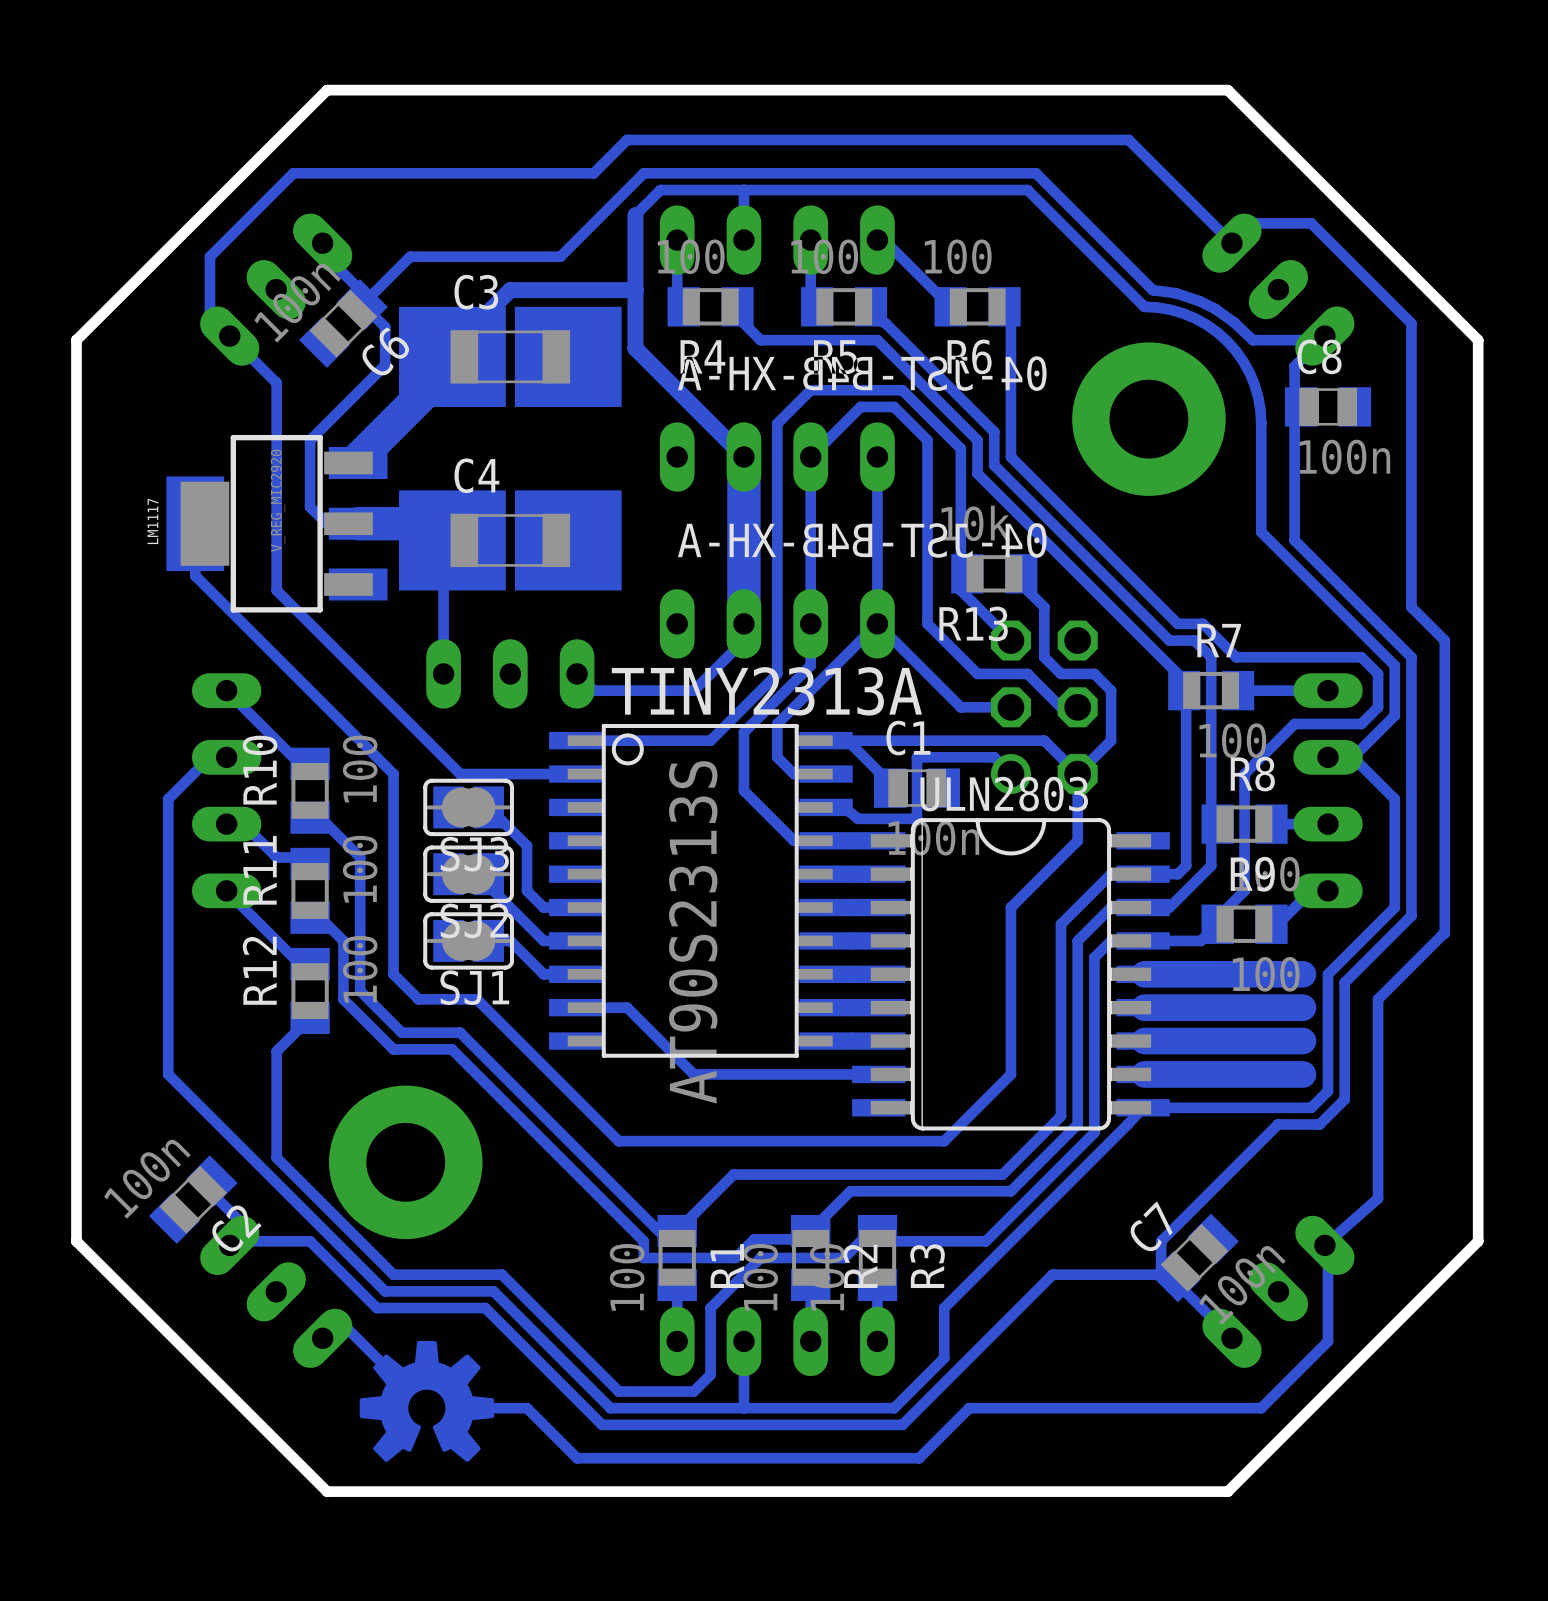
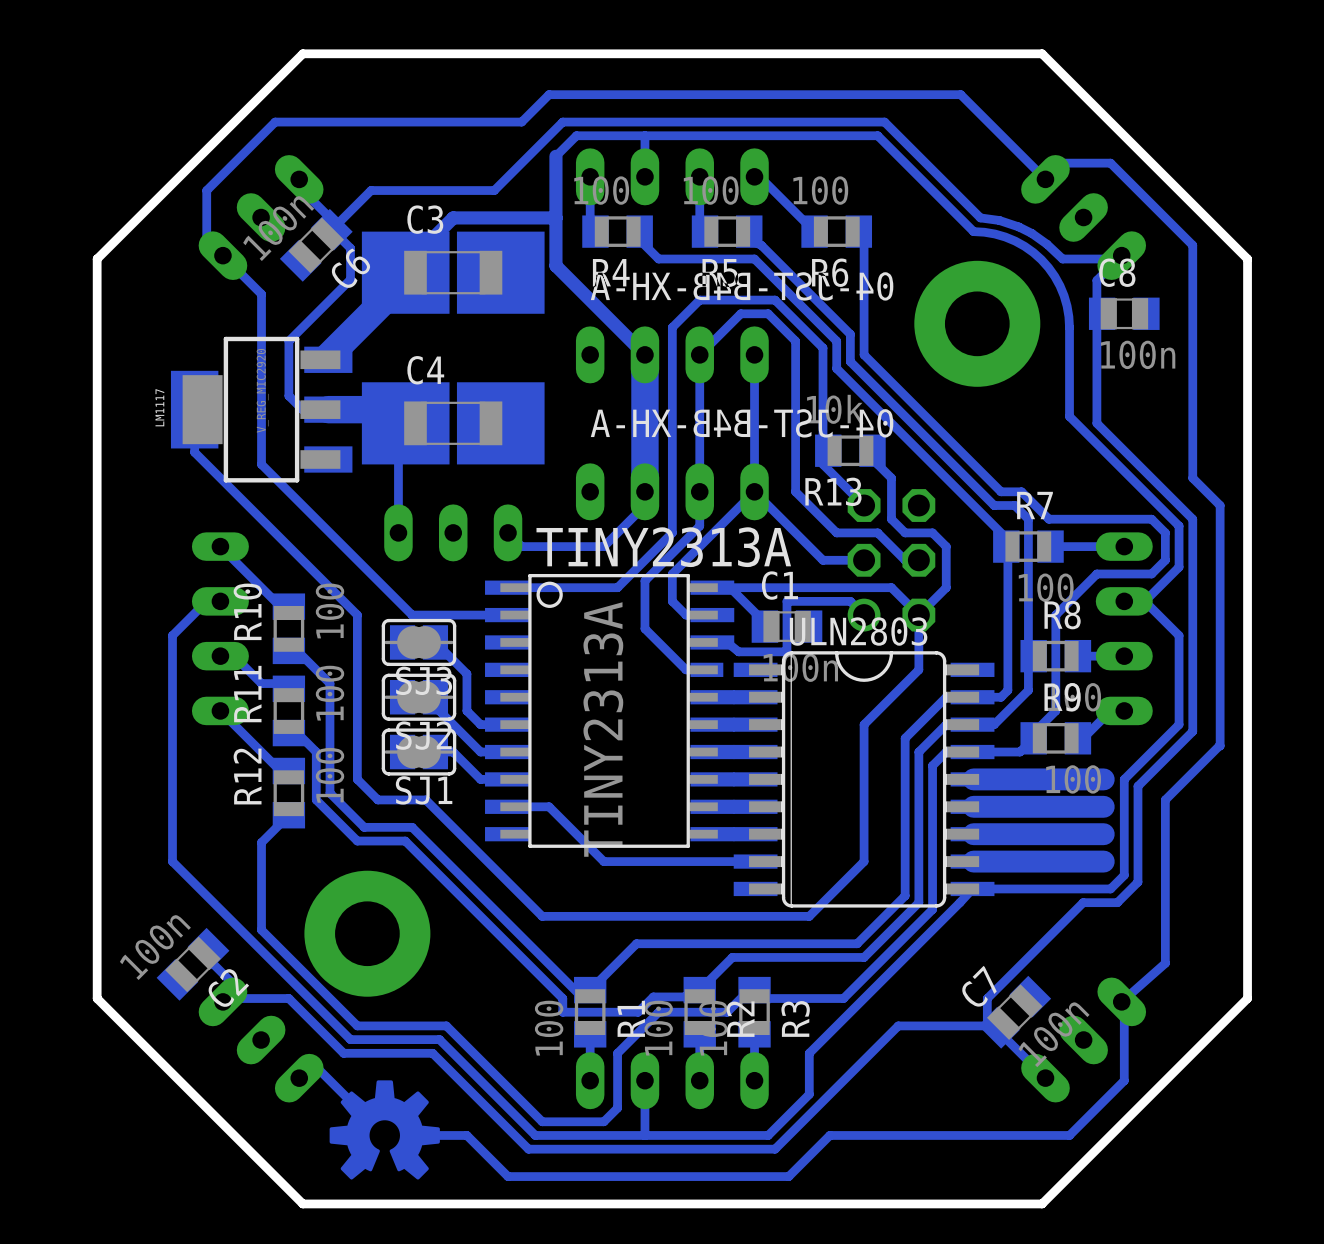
TINY2313A footprint: [549, 723, 853, 1058] -> [485, 573, 735, 848]
TINY2313A value: AT90S2313S (693, 932) -> TINY2313A (603, 729)

